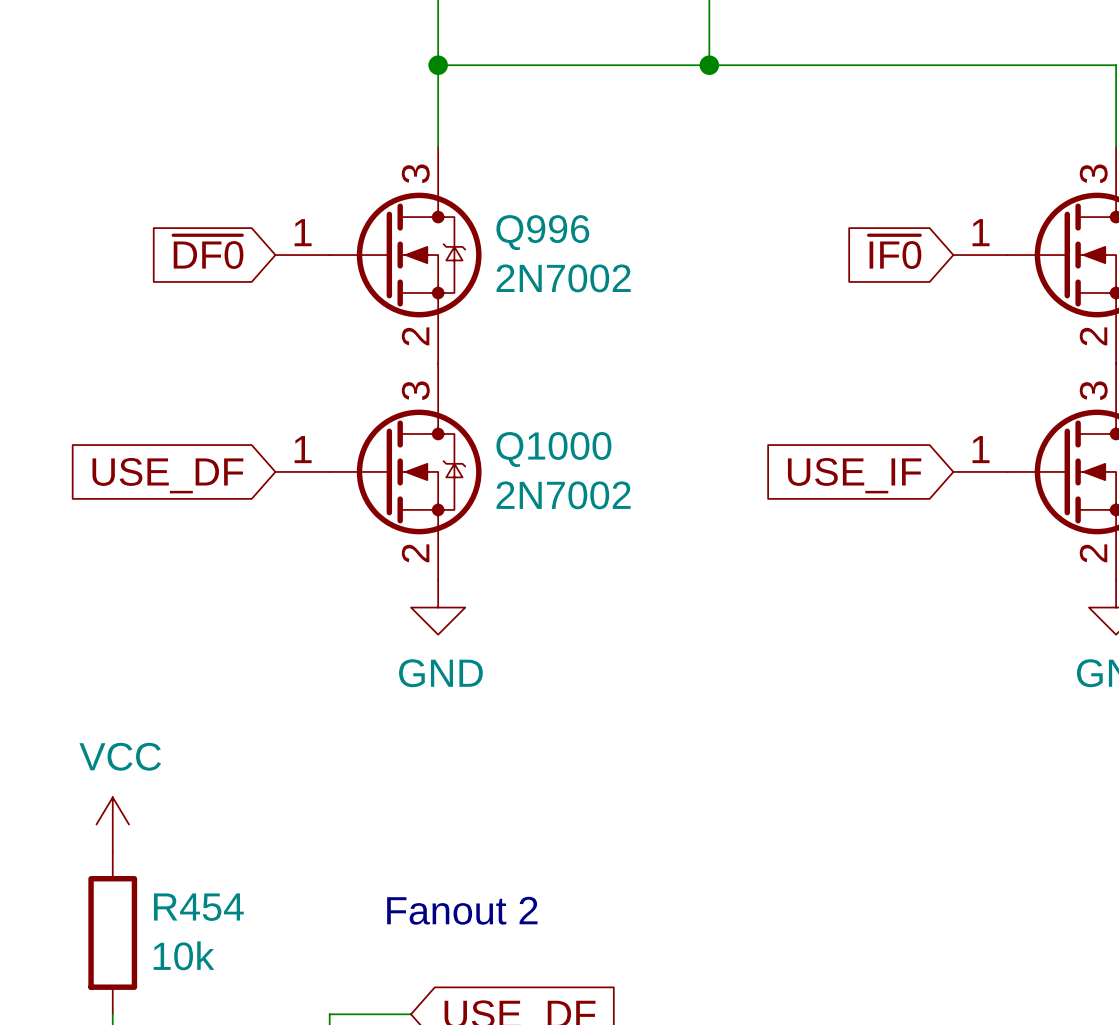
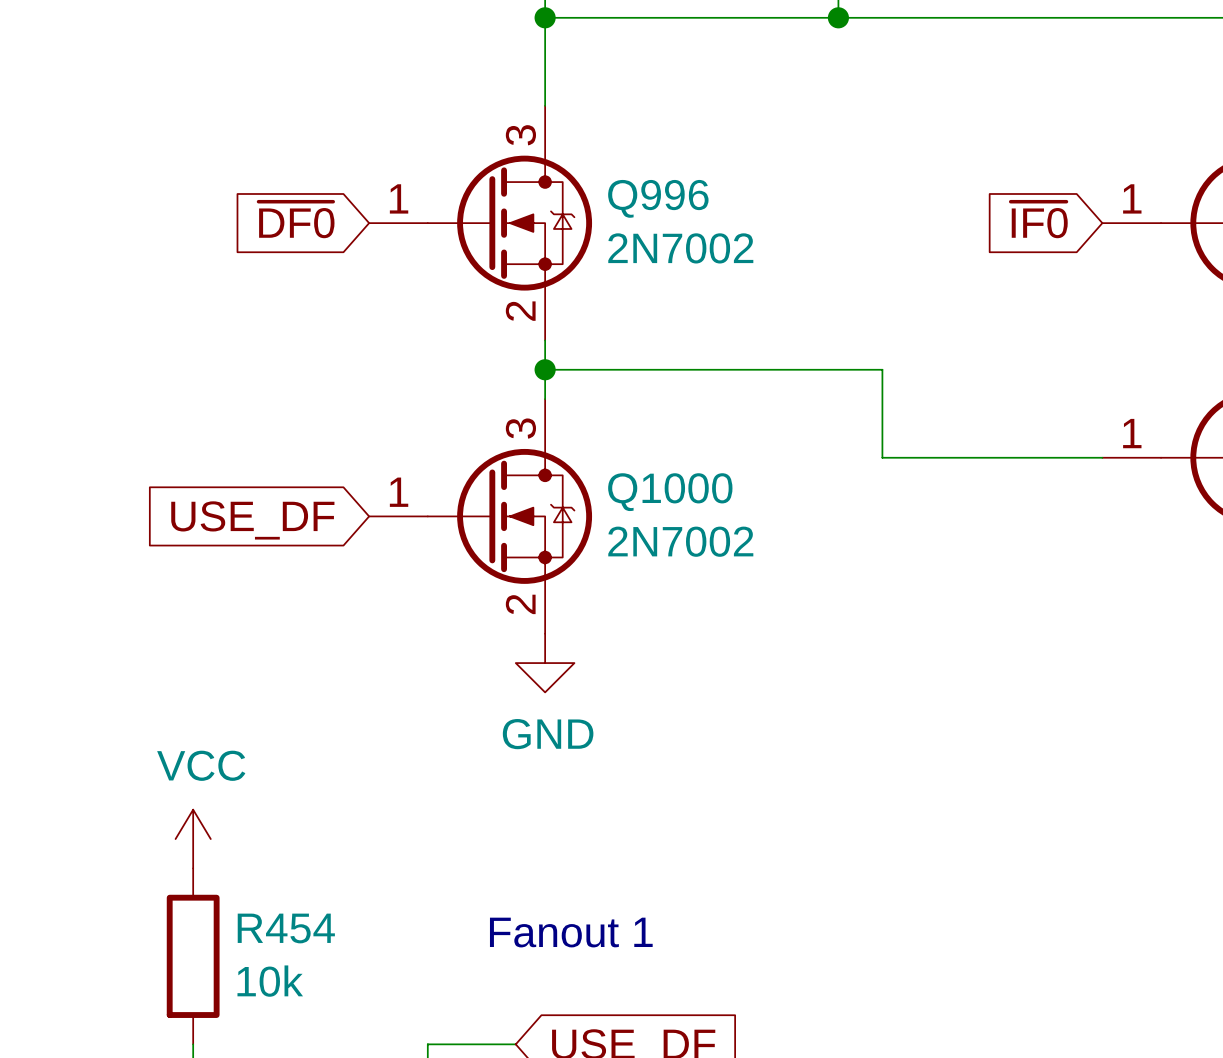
wire: none -> (545, 369) (882, 369) (882, 457) (1102, 457)
junction: none -> (545, 369)
Q1000 position: (378, 471) -> (480, 516)
global label position: USE_DF (167, 475) -> USE_DF (252, 520)
global label: USE_IF (854, 475) -> none
power symbol position: GND (438, 607) -> GND (545, 663)
text: Fanout 2 (462, 910) -> Fanout 1 (571, 932)

